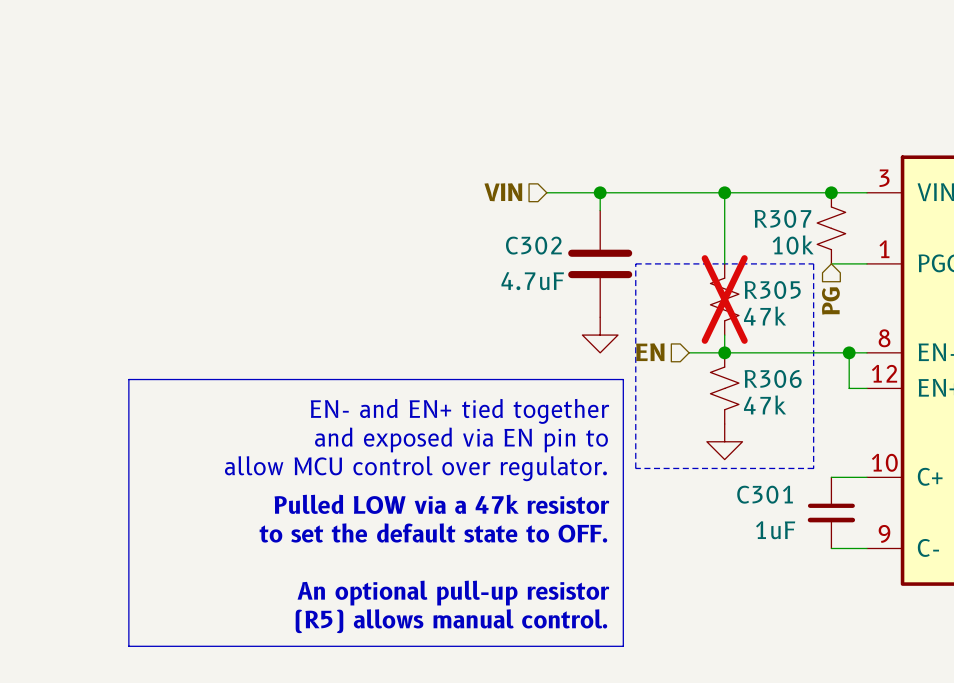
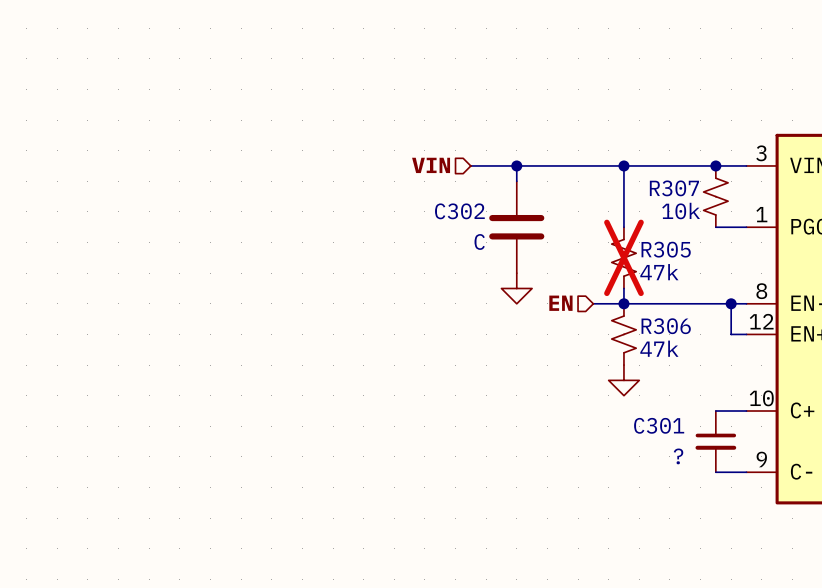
line: (635, 263) (813, 263) (813, 468) (635, 468) (635, 263) -> none
C302 value: 4.7uF (532, 281) -> C (479, 241)
hierarchical label: PG (830, 300) -> none
line: (128, 379) (623, 379) (623, 646) (128, 646) (128, 379) -> none
text: EN- and EN+ tied together (459, 411) -> none
text: and exposed via EN pin to (461, 439) -> none
text: allow MCU control over regulator. (415, 468) -> none
text: Pulled LOW via a 47k resistor (441, 504) -> none
C301 value: 1uF (775, 530) -> ? (678, 456)
text: to set the default state to OFF. (433, 532) -> none
text: An optional pull-up resistor (453, 593) -> none
text: (R5) allows manual control. (451, 621) -> none

